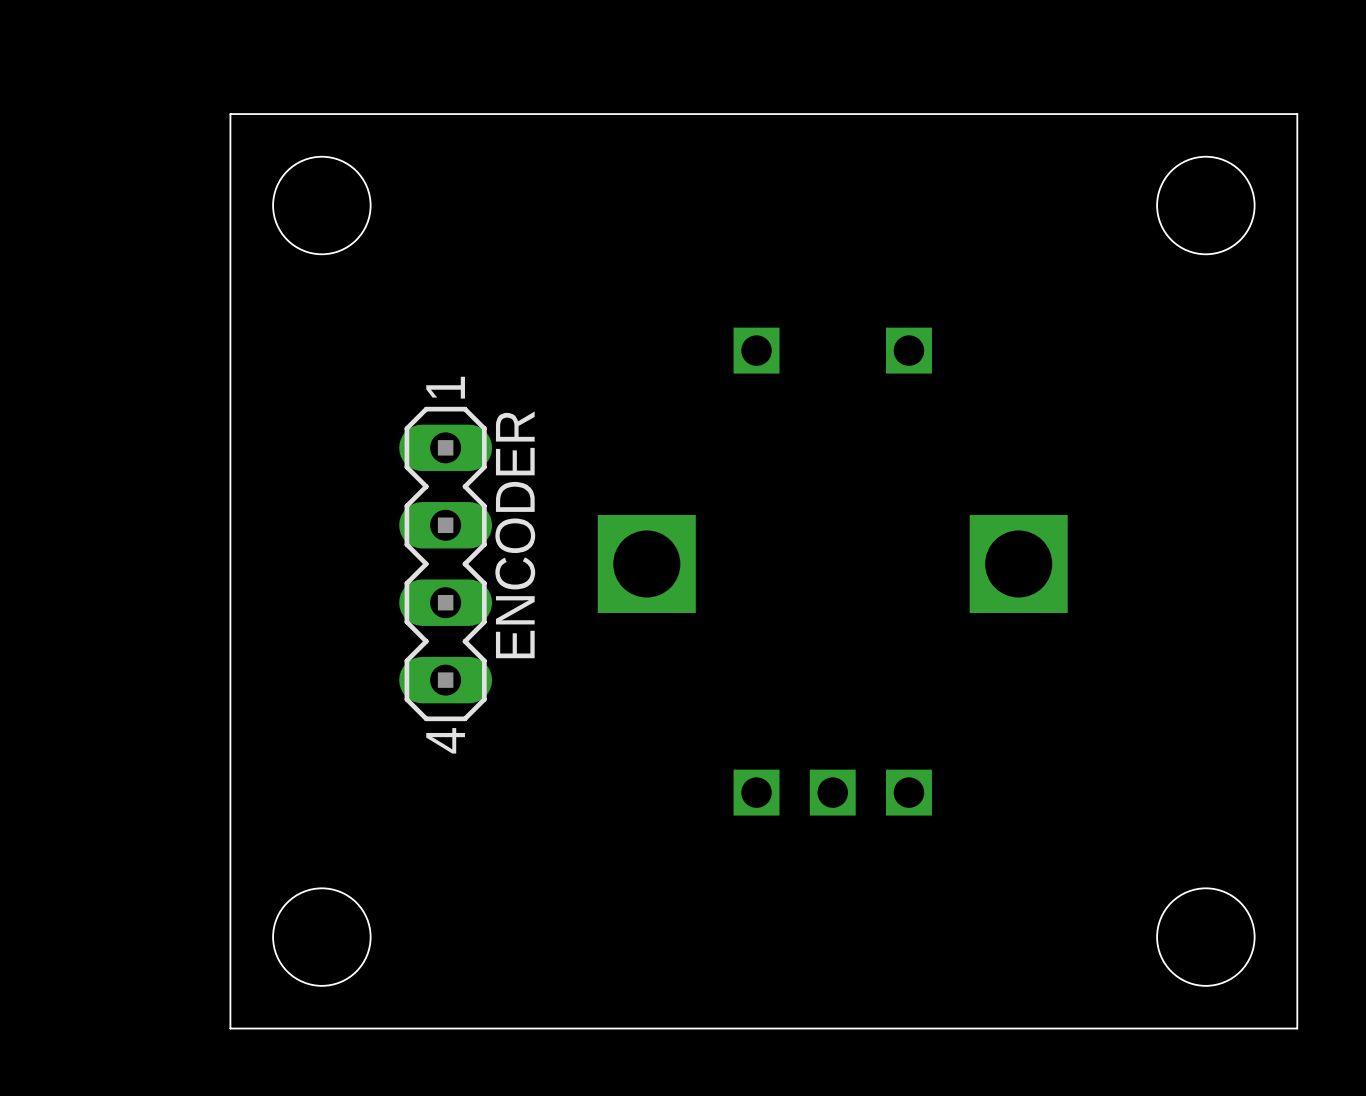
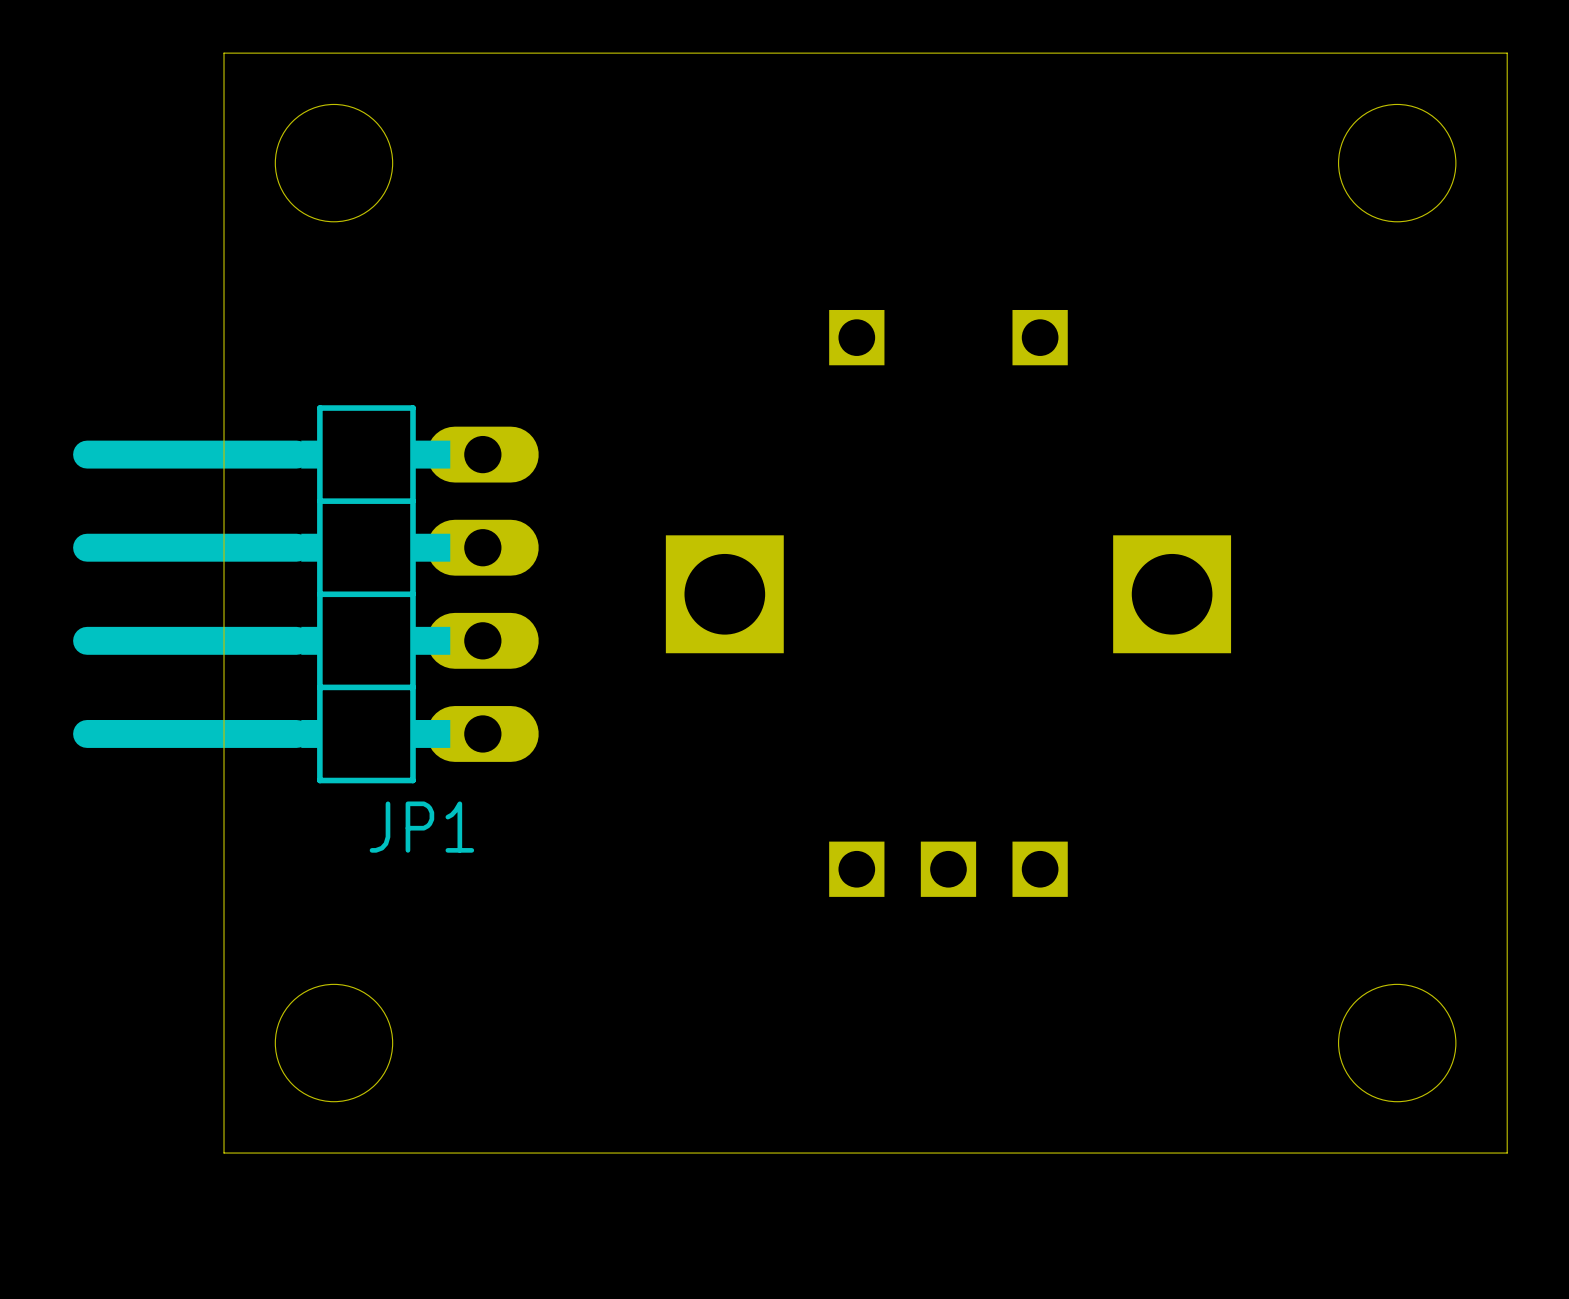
JP1: none -> (305, 594)
ENCODER: (445, 563) -> none

